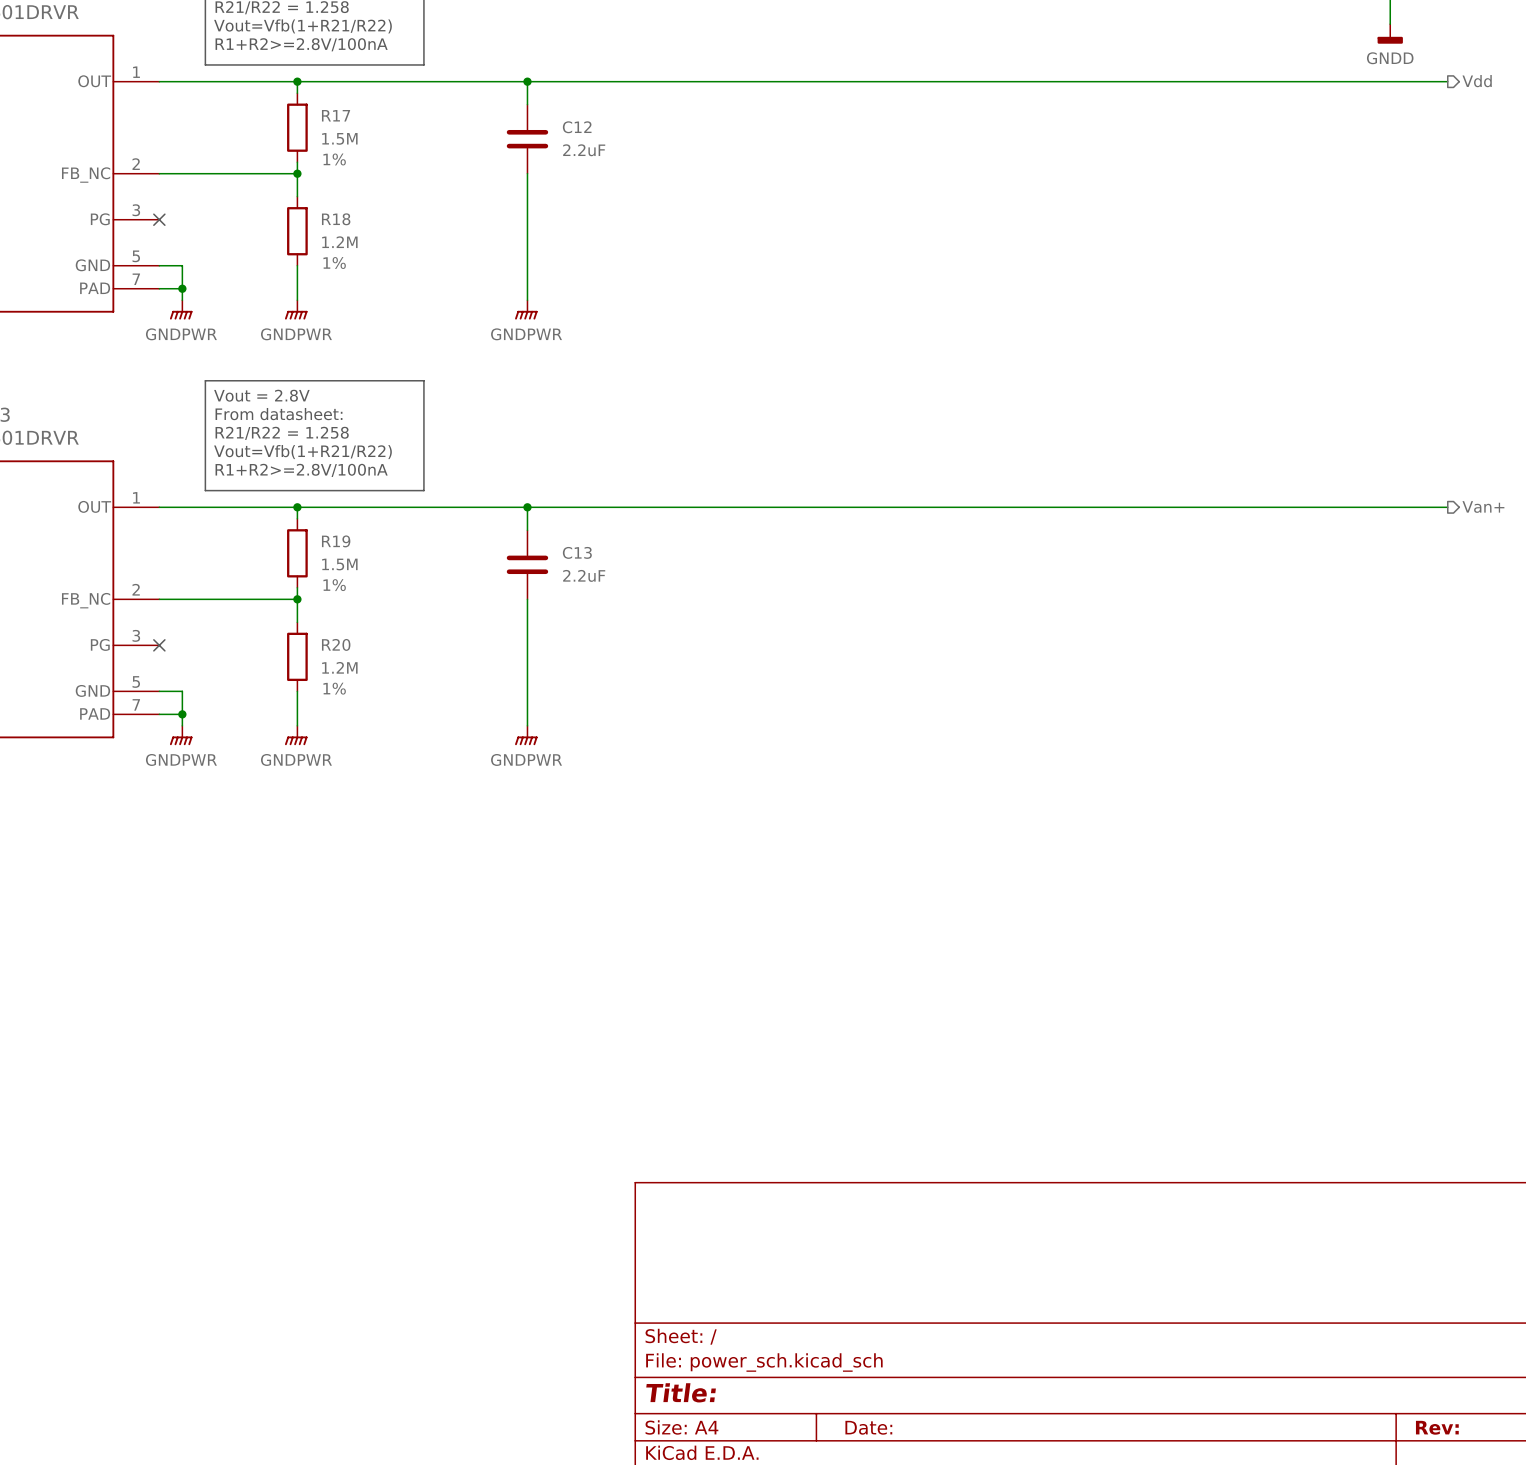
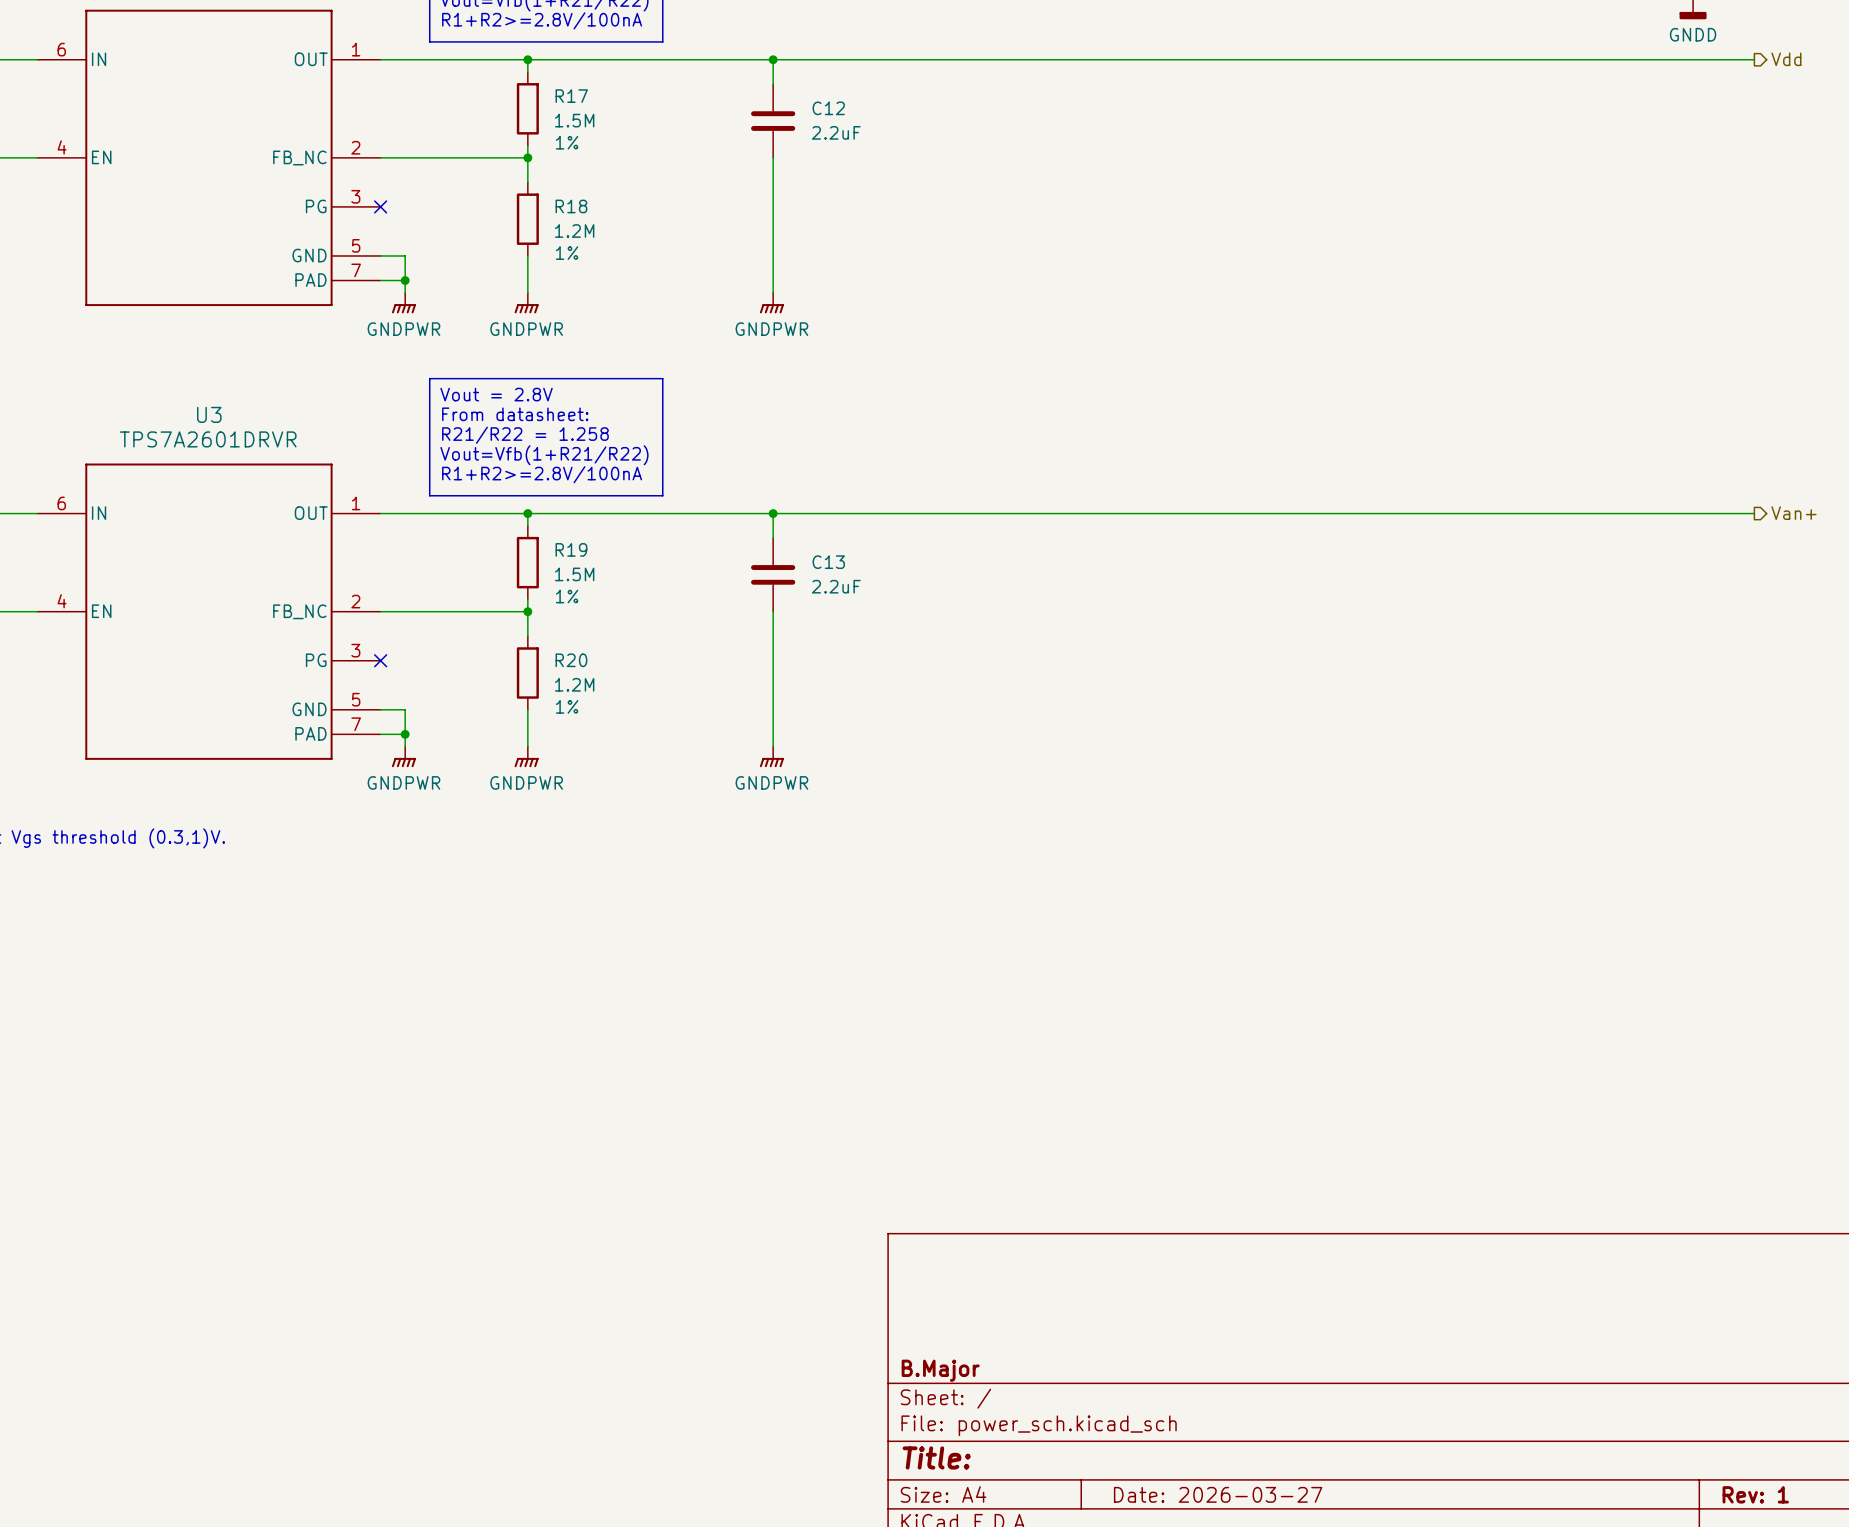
title block: none -> B.Major (940, 1370)
title block: Date: (868, 1427) -> Date: 2026-03-27 (1218, 1494)
title block: Rev: (1437, 1427) -> Rev: 1 (1755, 1494)

